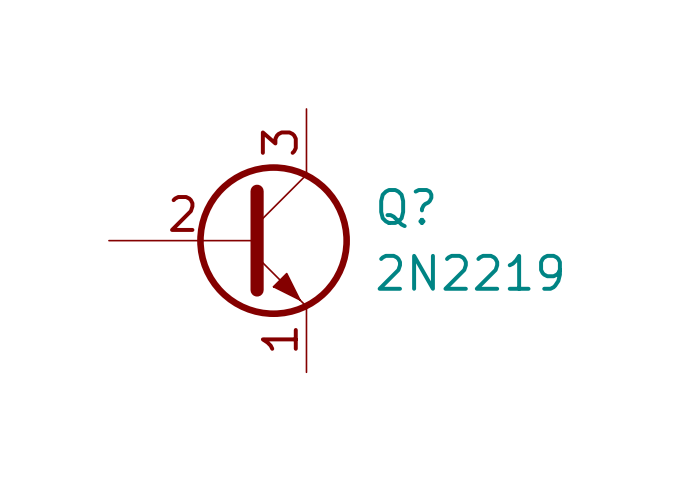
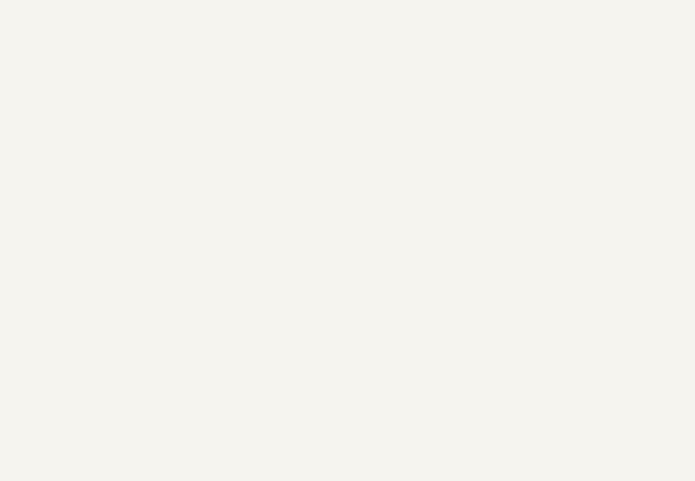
Q?: 2N2219 (229, 240) -> none

